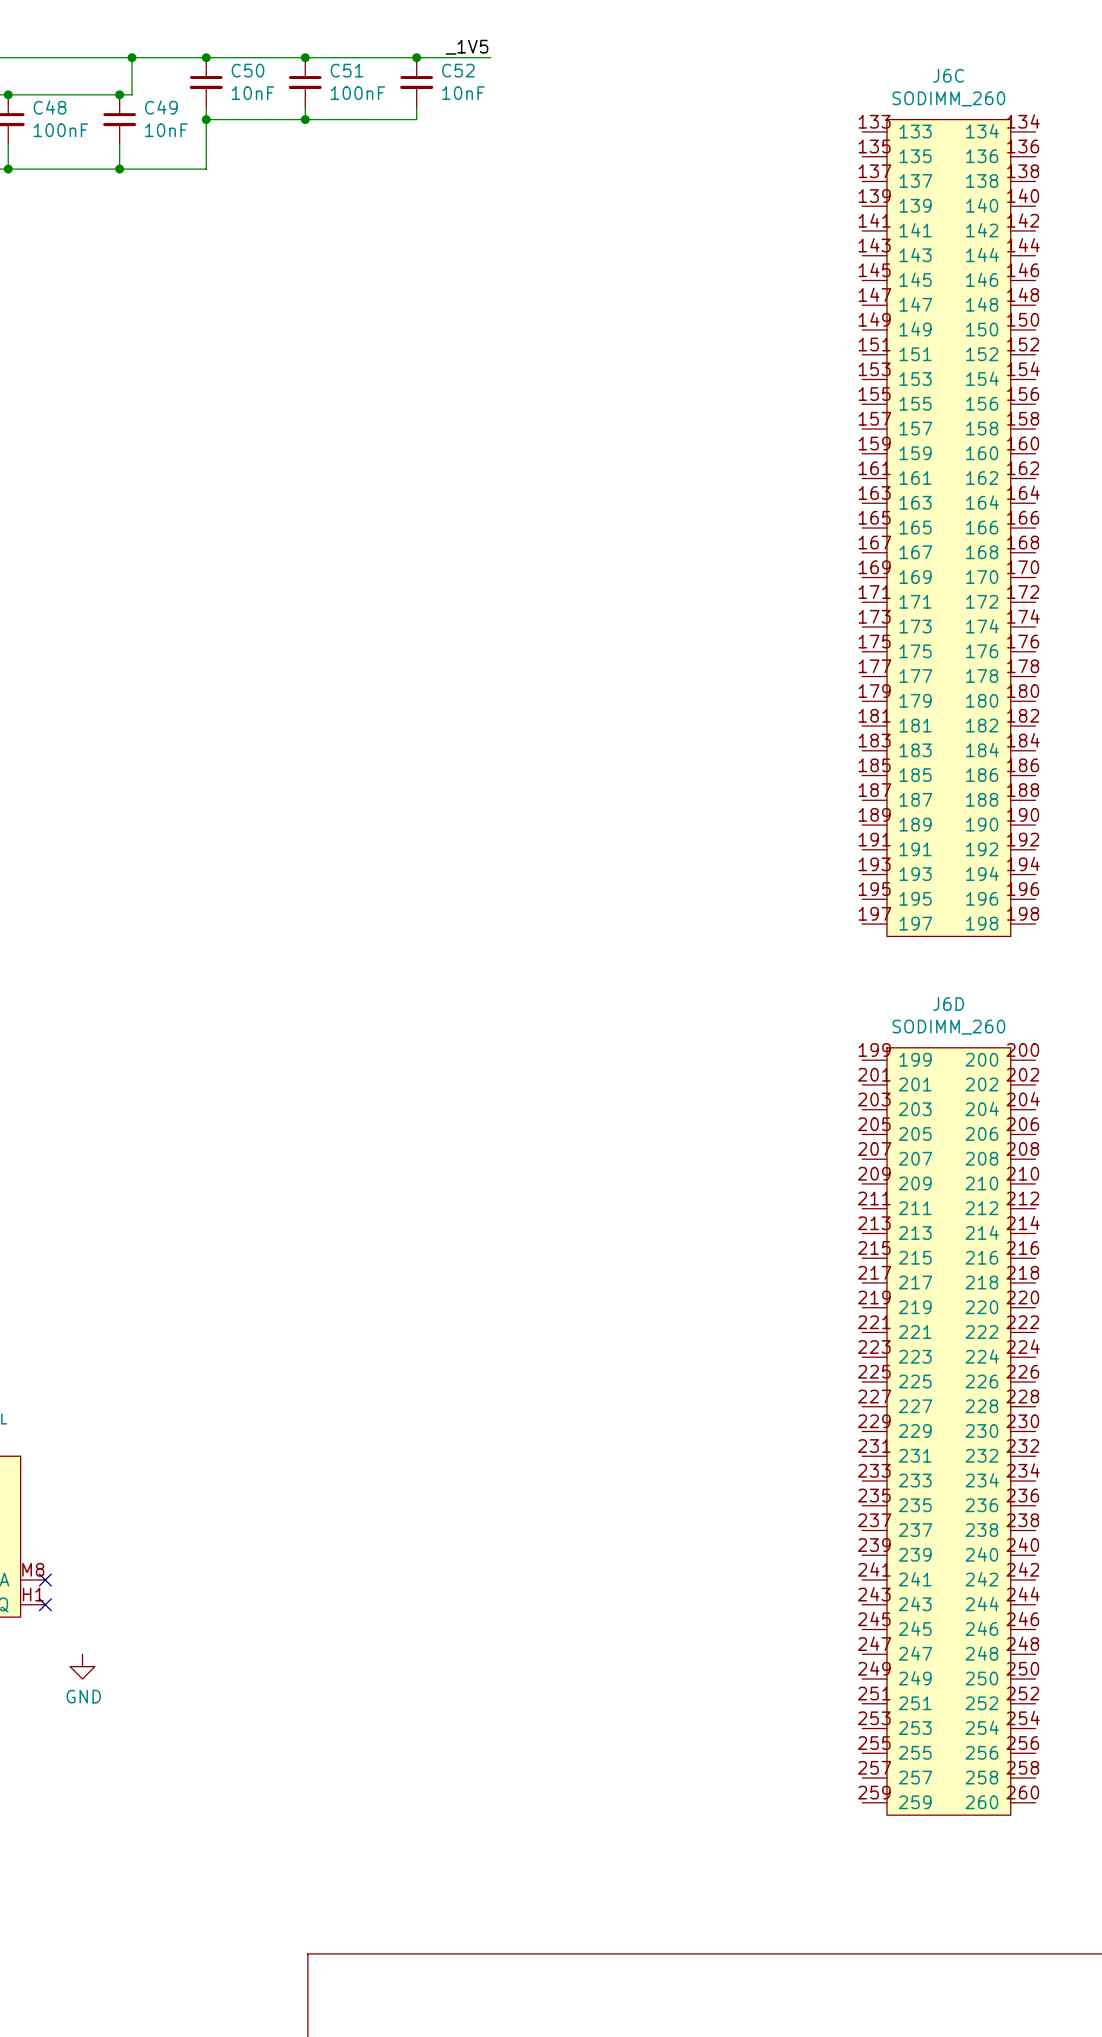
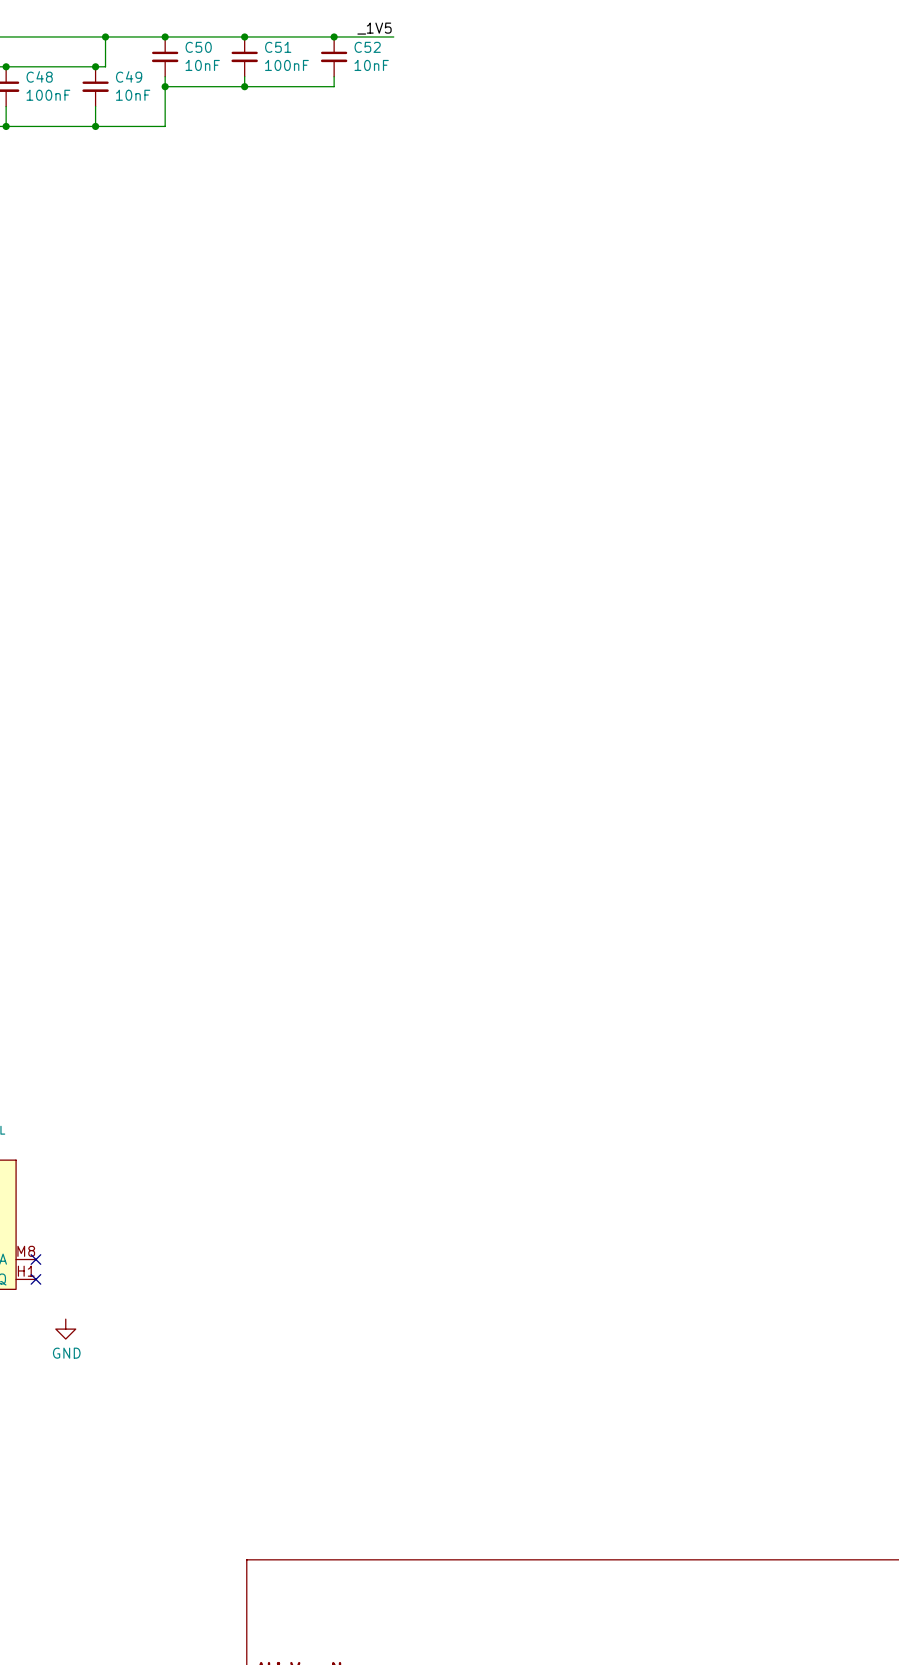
J6C: SODIMM_260 (948, 528) -> none
J6D: SODIMM_260 (948, 1431) -> none

